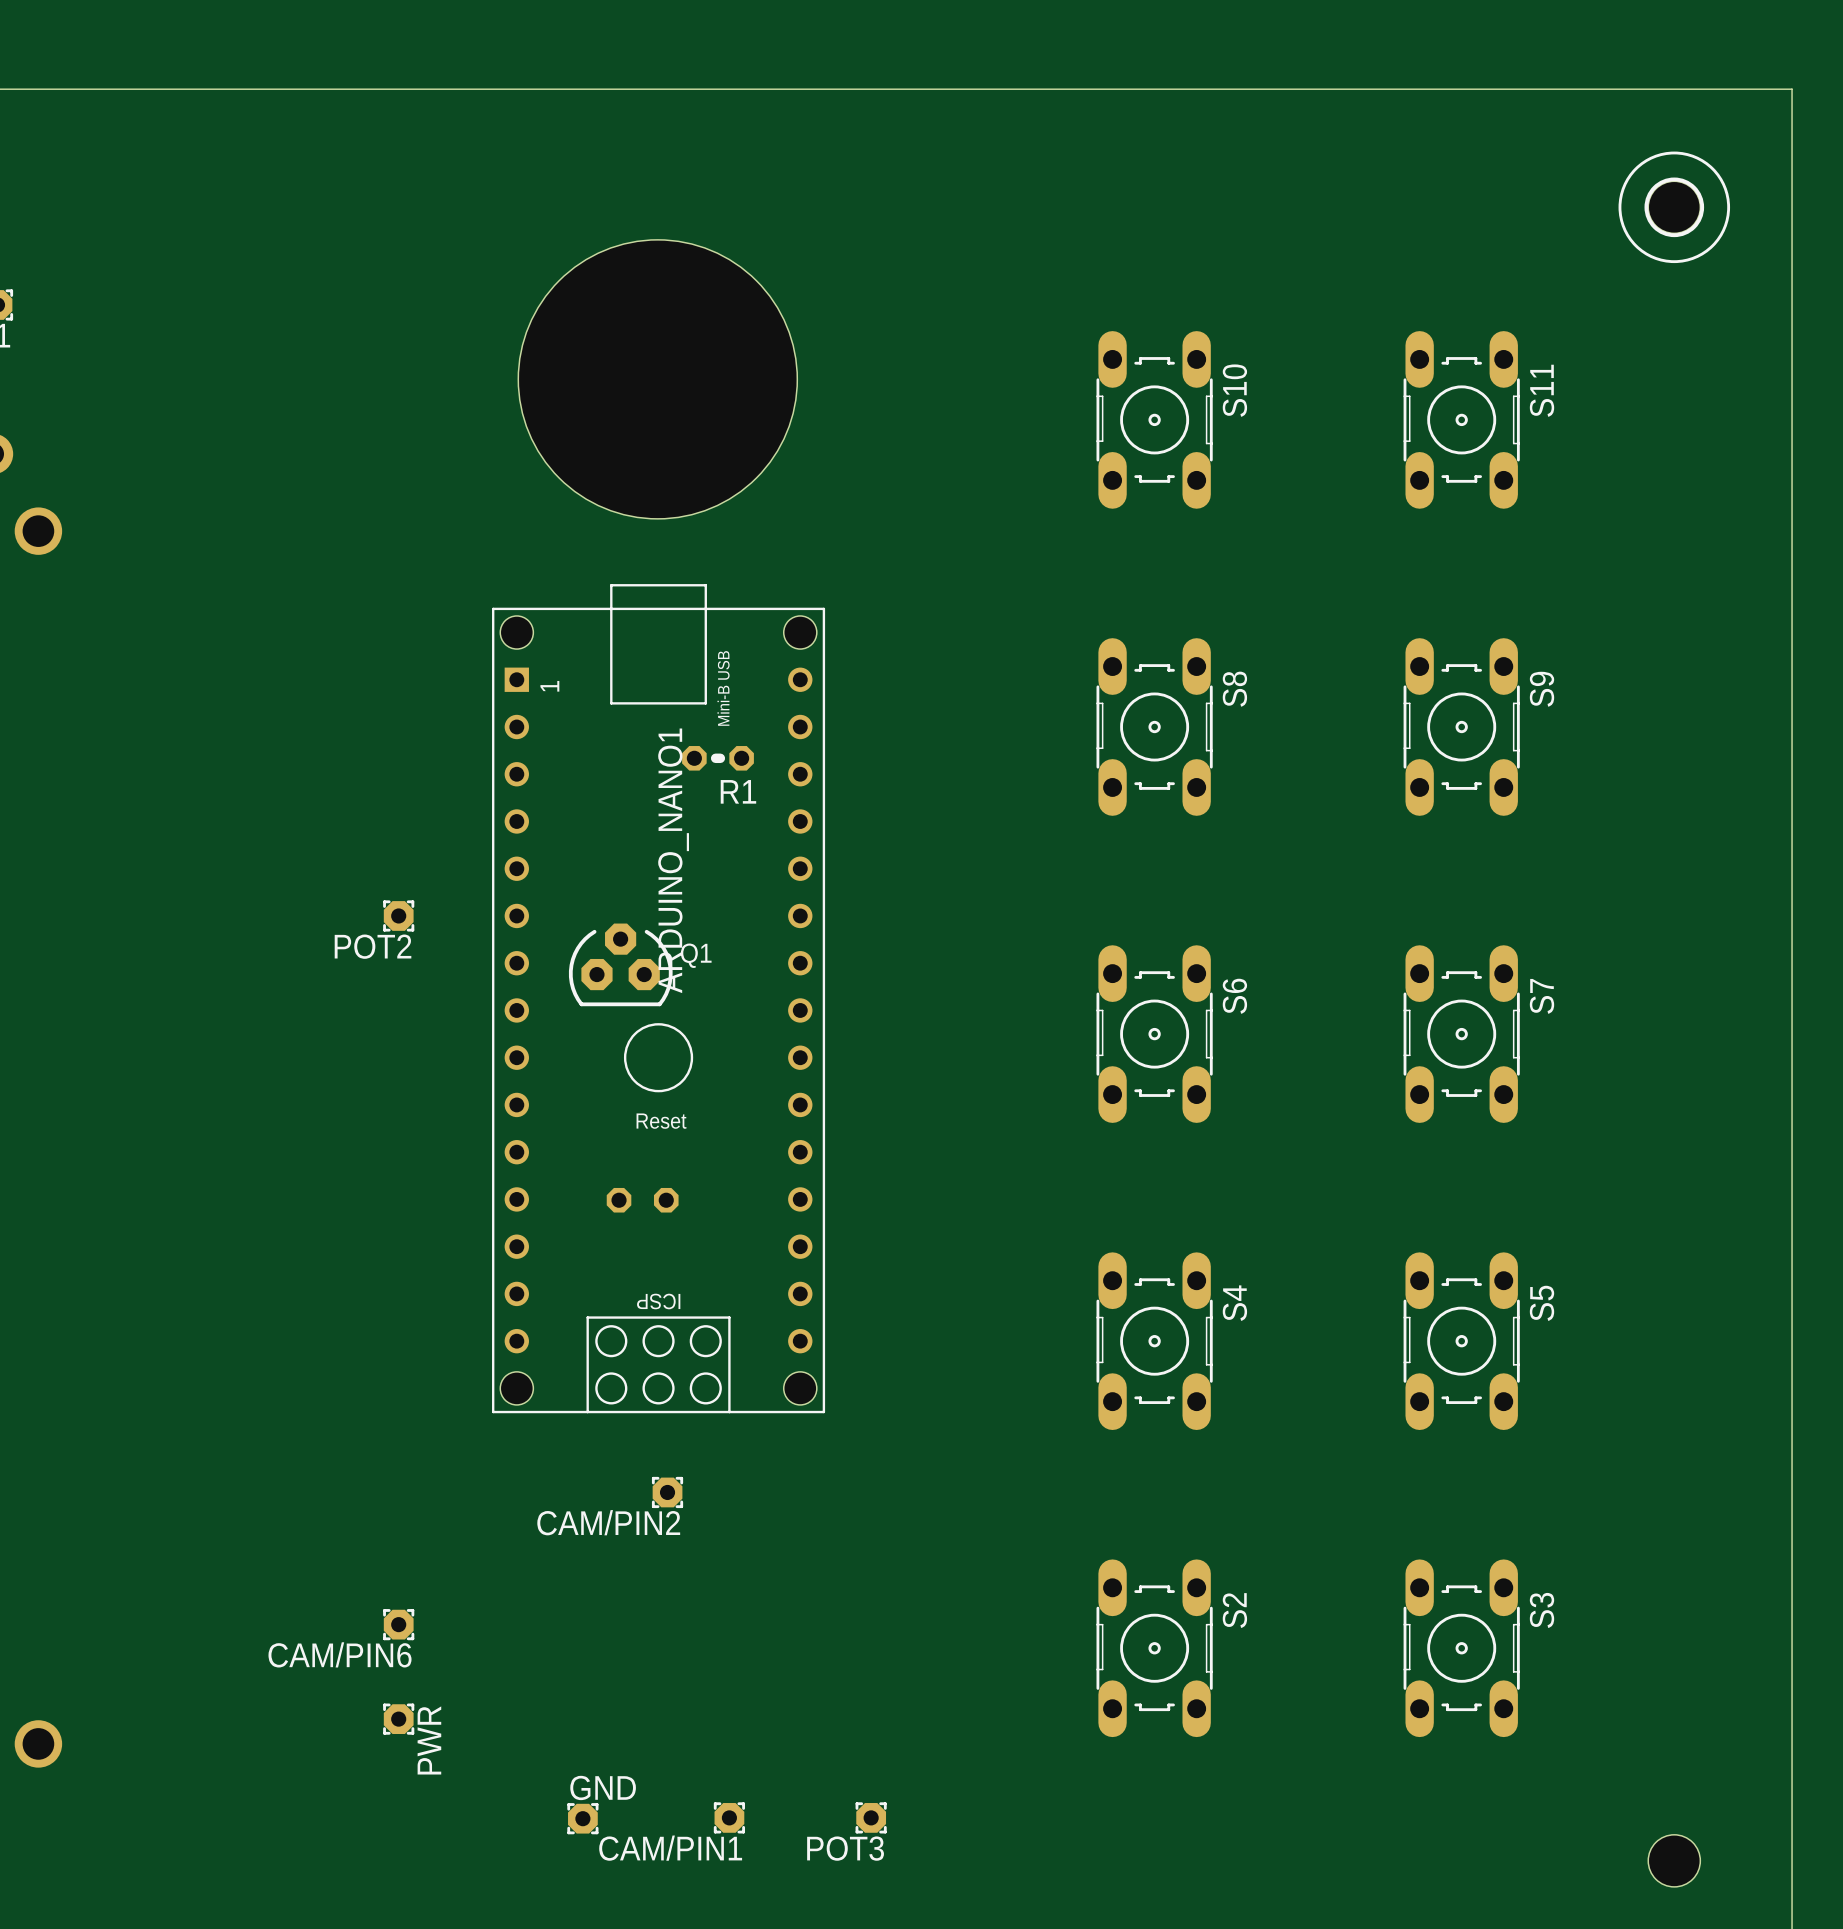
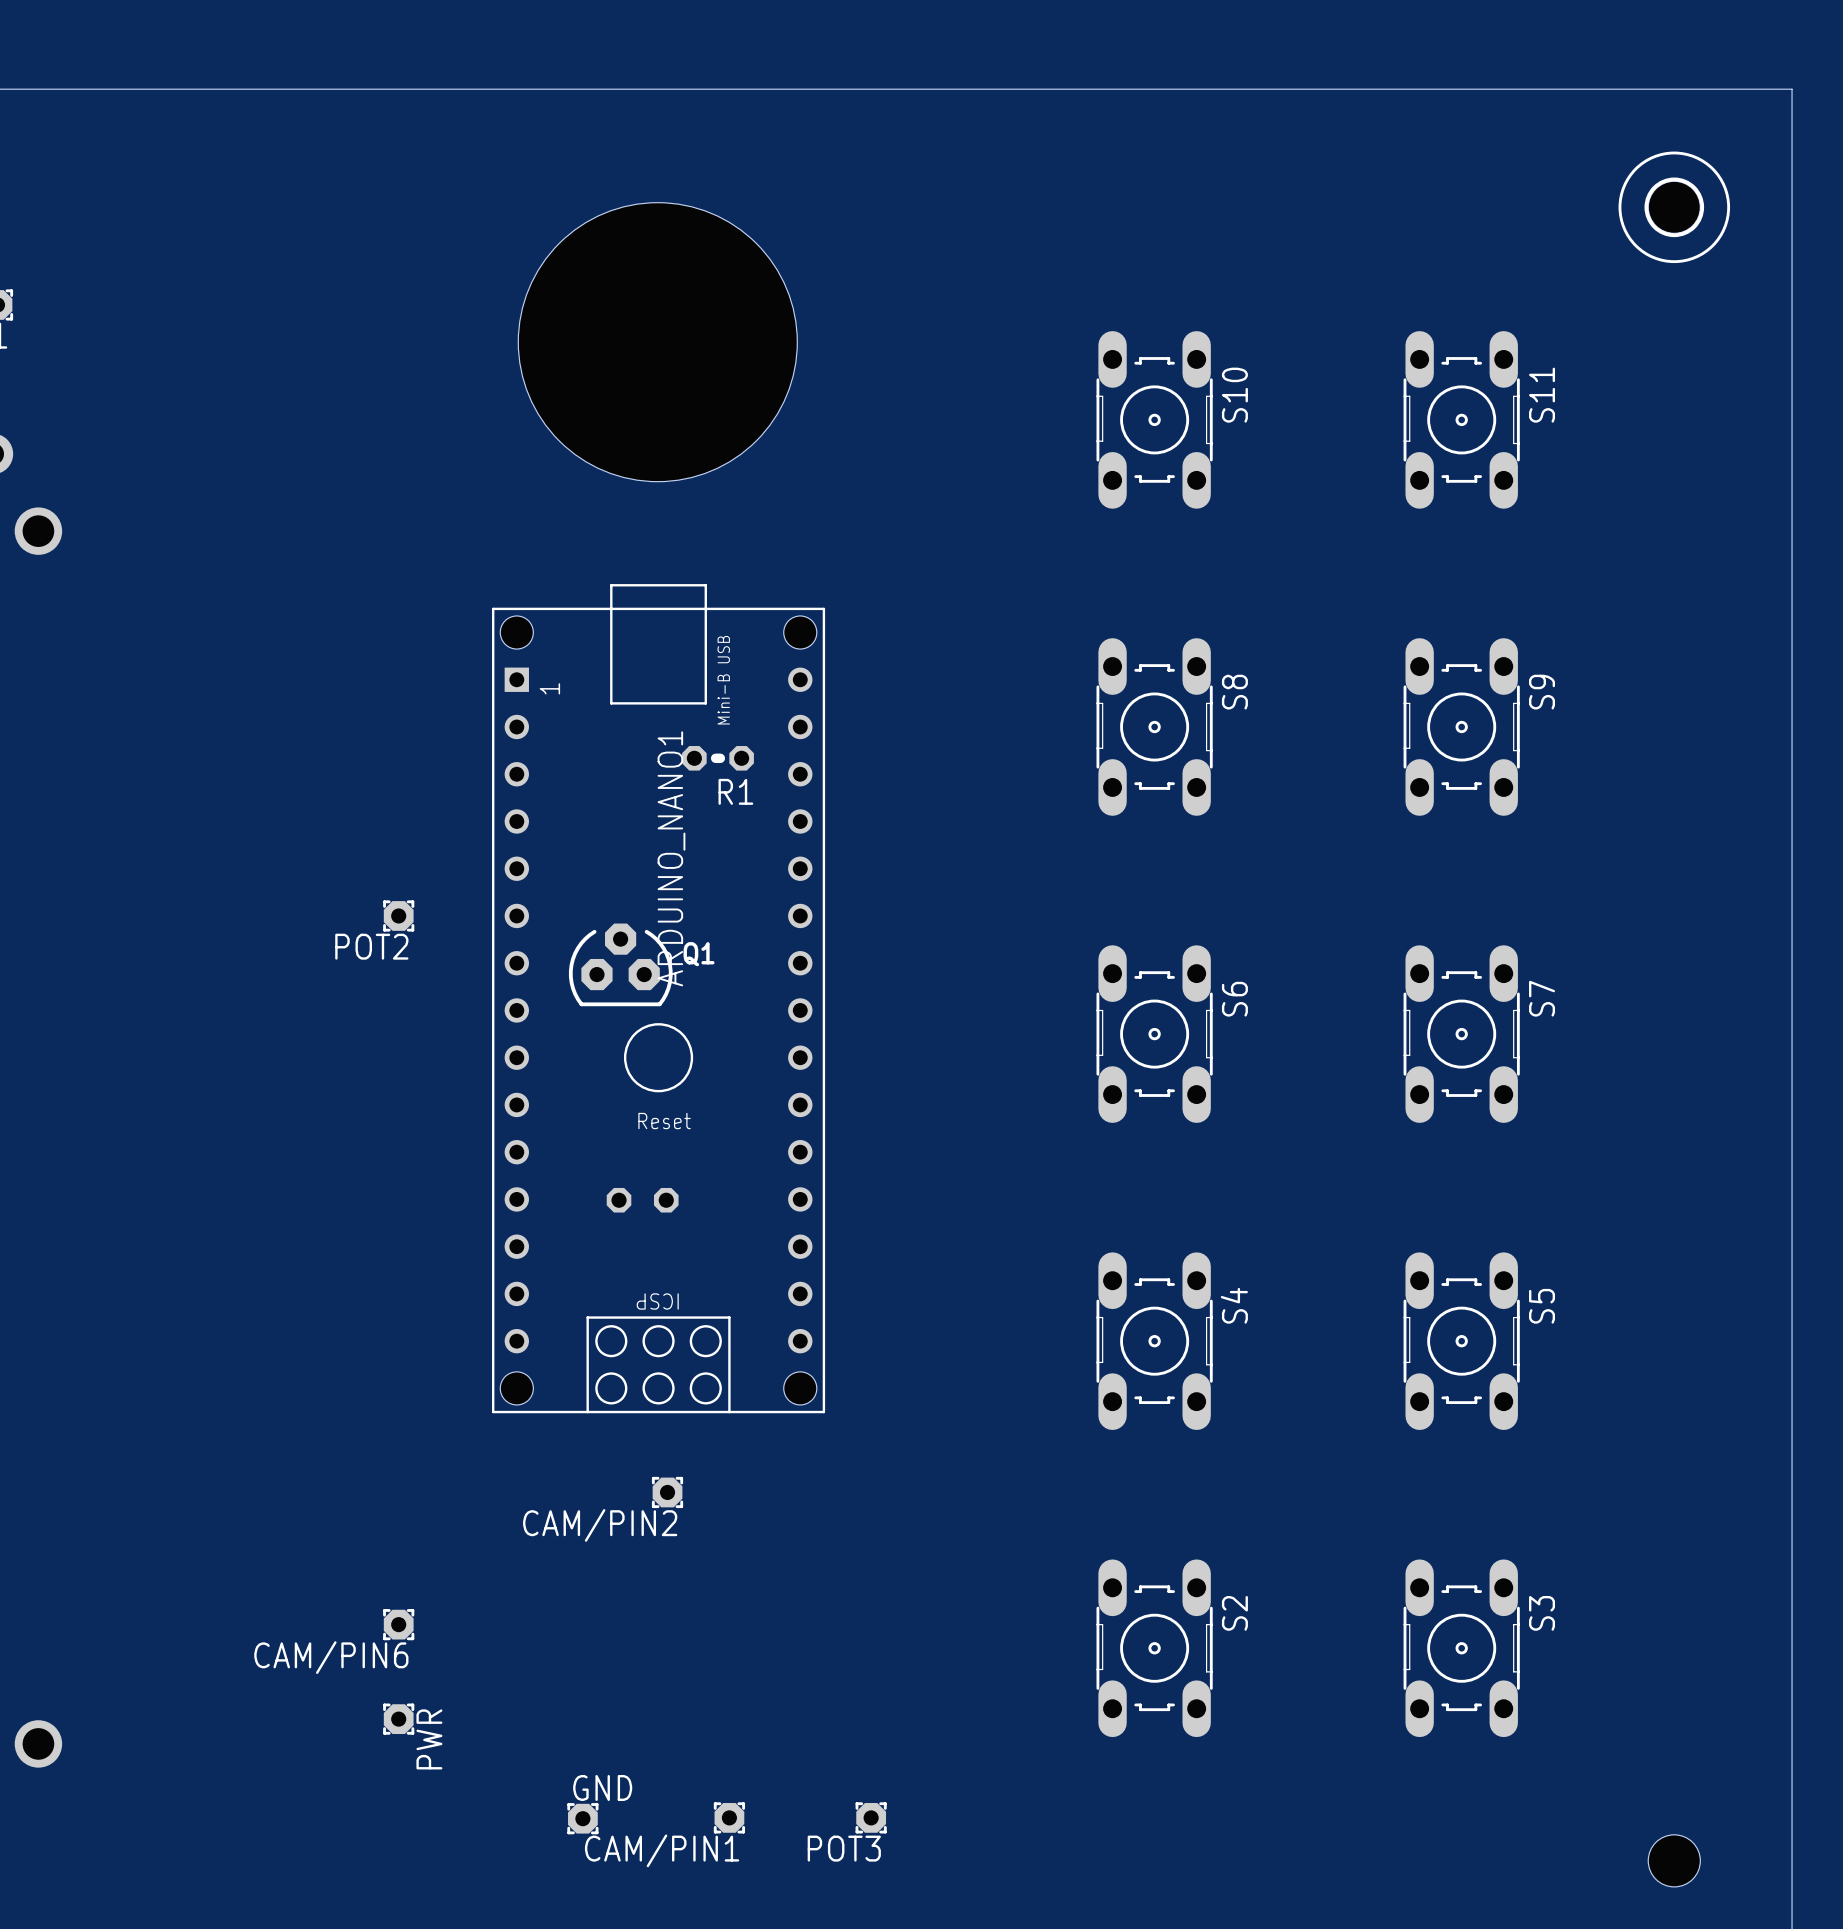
hole position: (657, 379) -> (657, 342)

